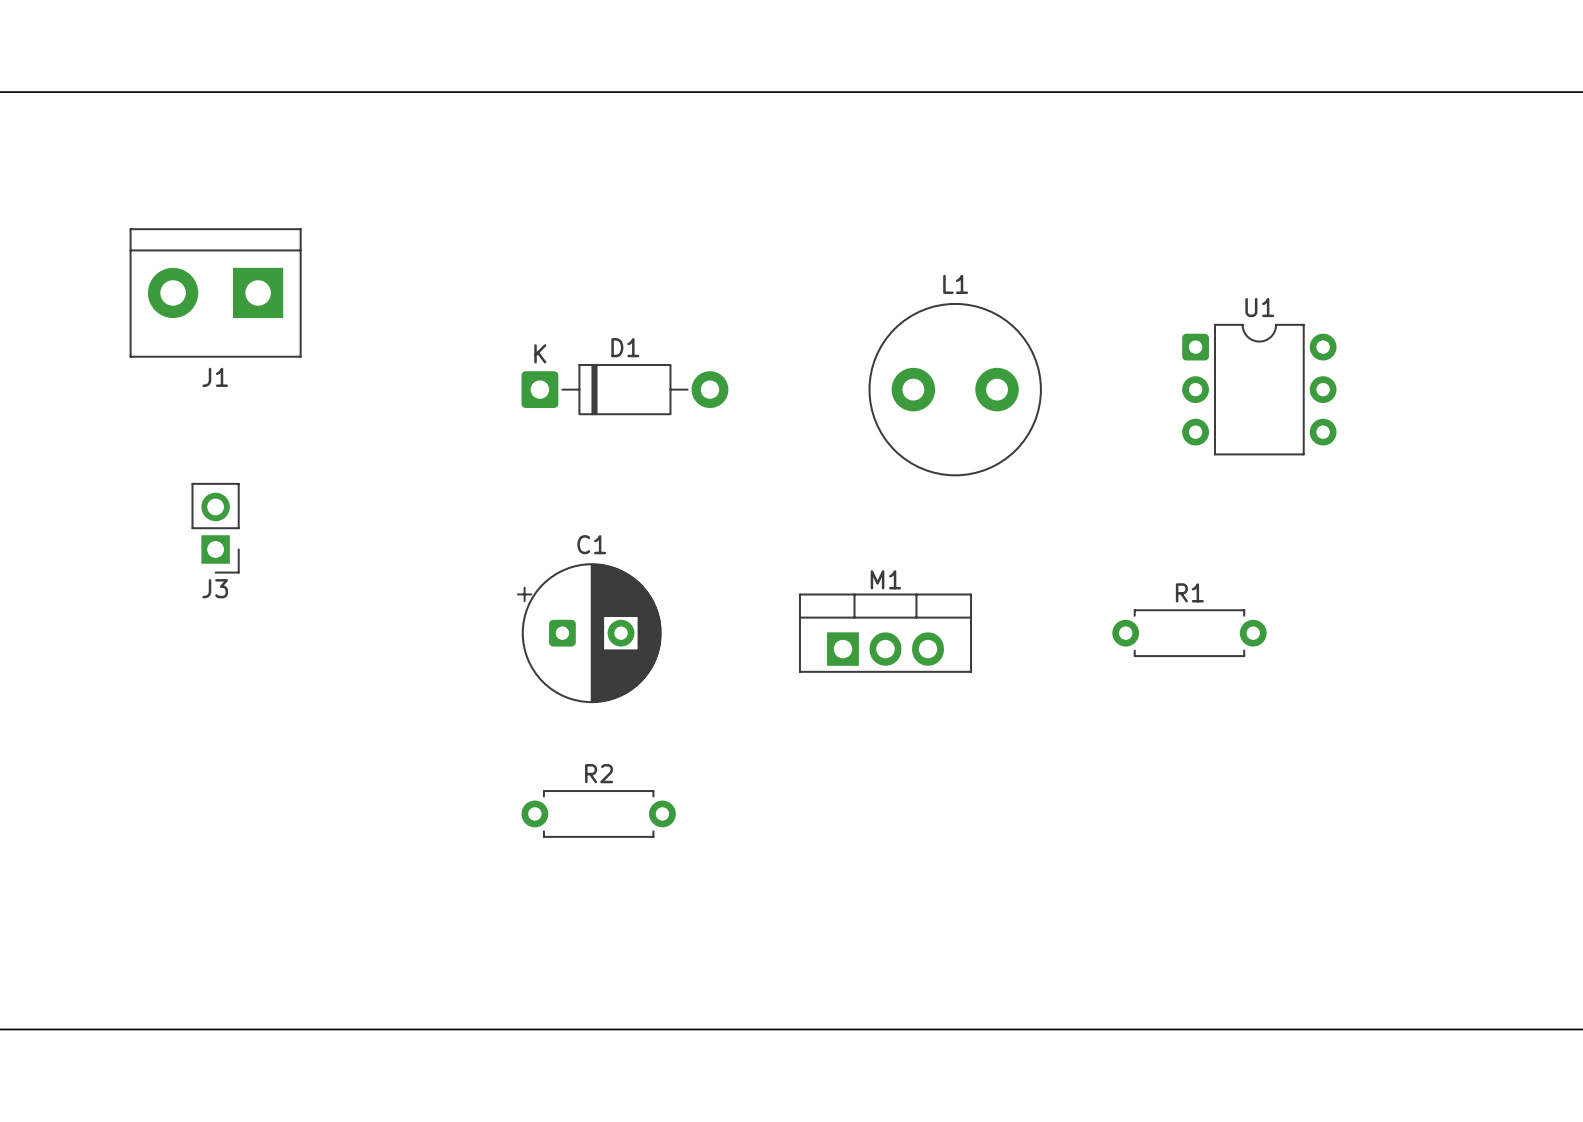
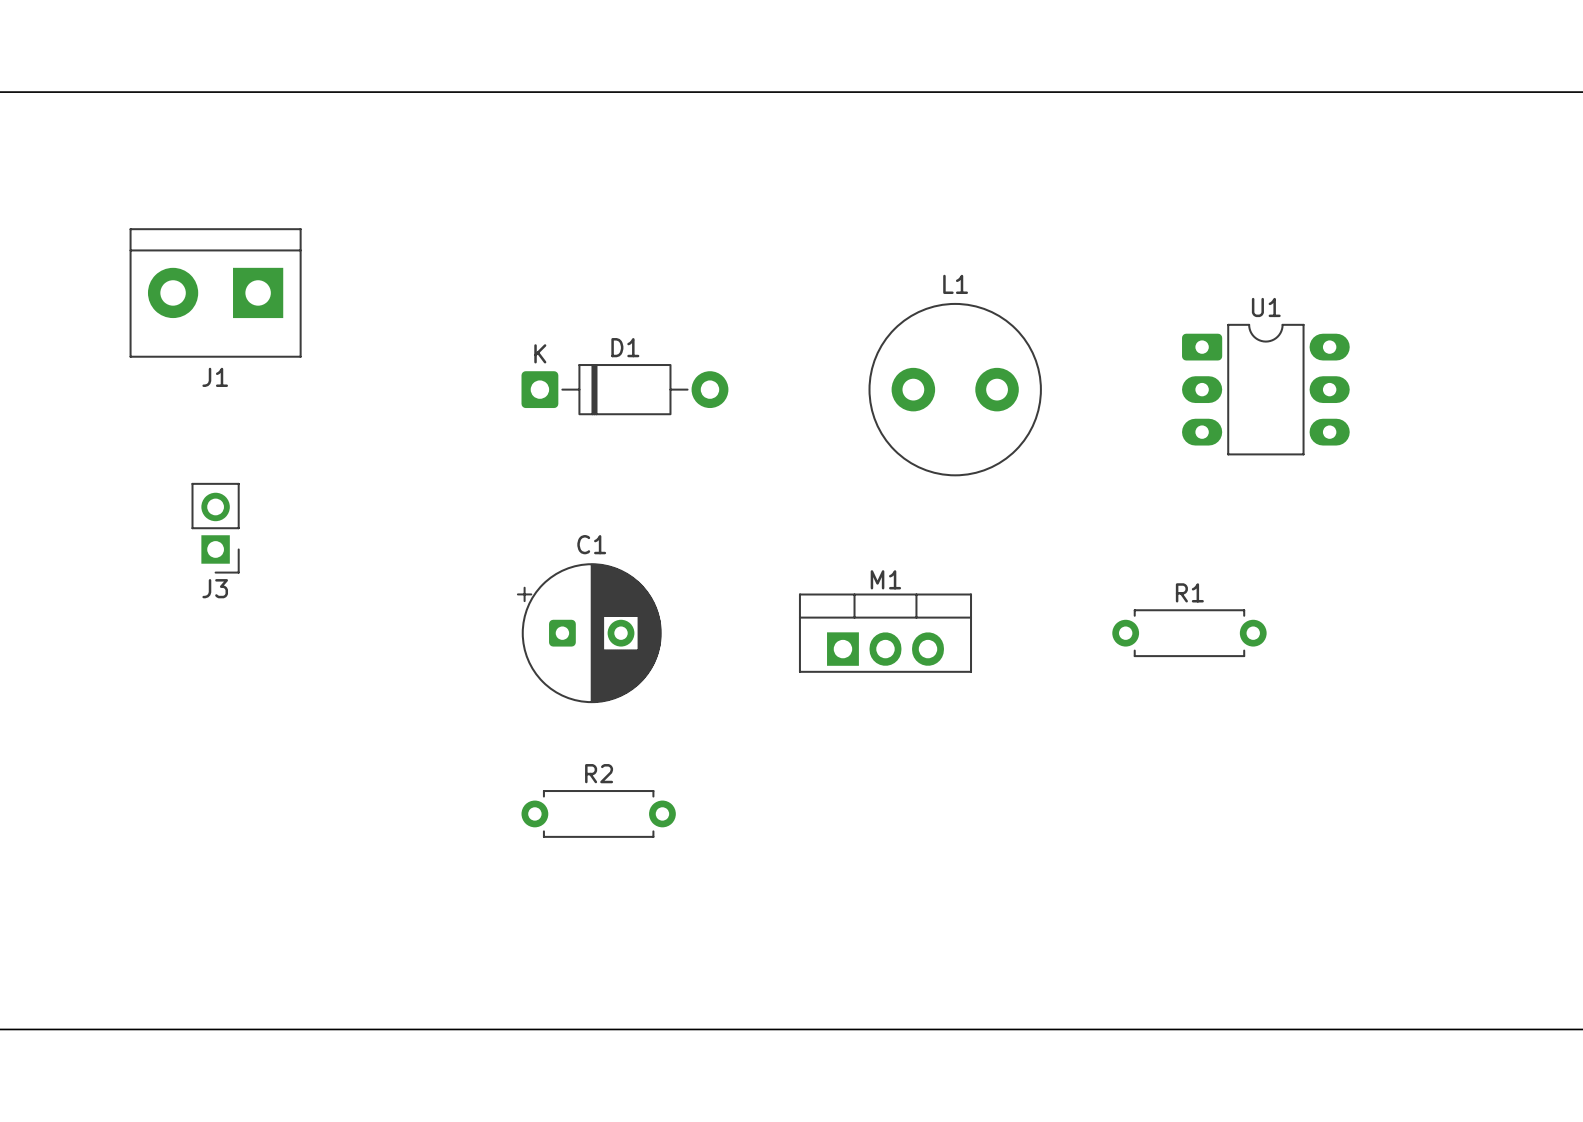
U1 footprint: [1182, 323, 1337, 456] -> [1182, 323, 1350, 456]

